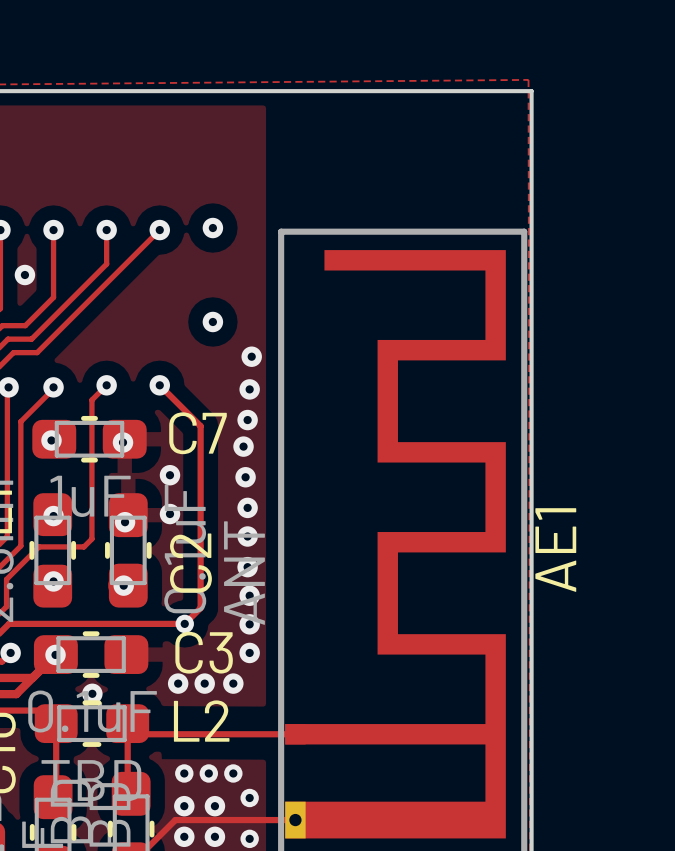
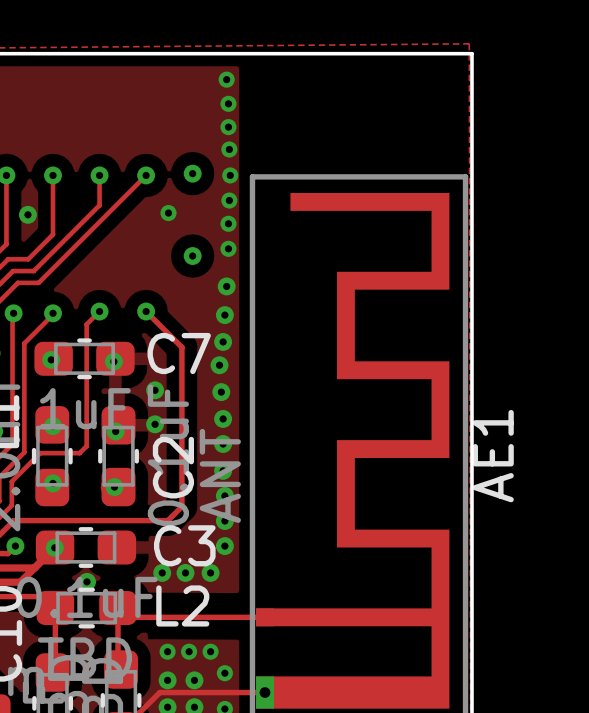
via: none -> (226, 79)
via: none -> (228, 103)
via: none -> (228, 127)
via: none -> (229, 149)
via: none -> (230, 175)
via: none -> (229, 200)
via: none -> (168, 213)
via: none -> (228, 223)
via: none -> (228, 248)
via: (184, 623) -> none

